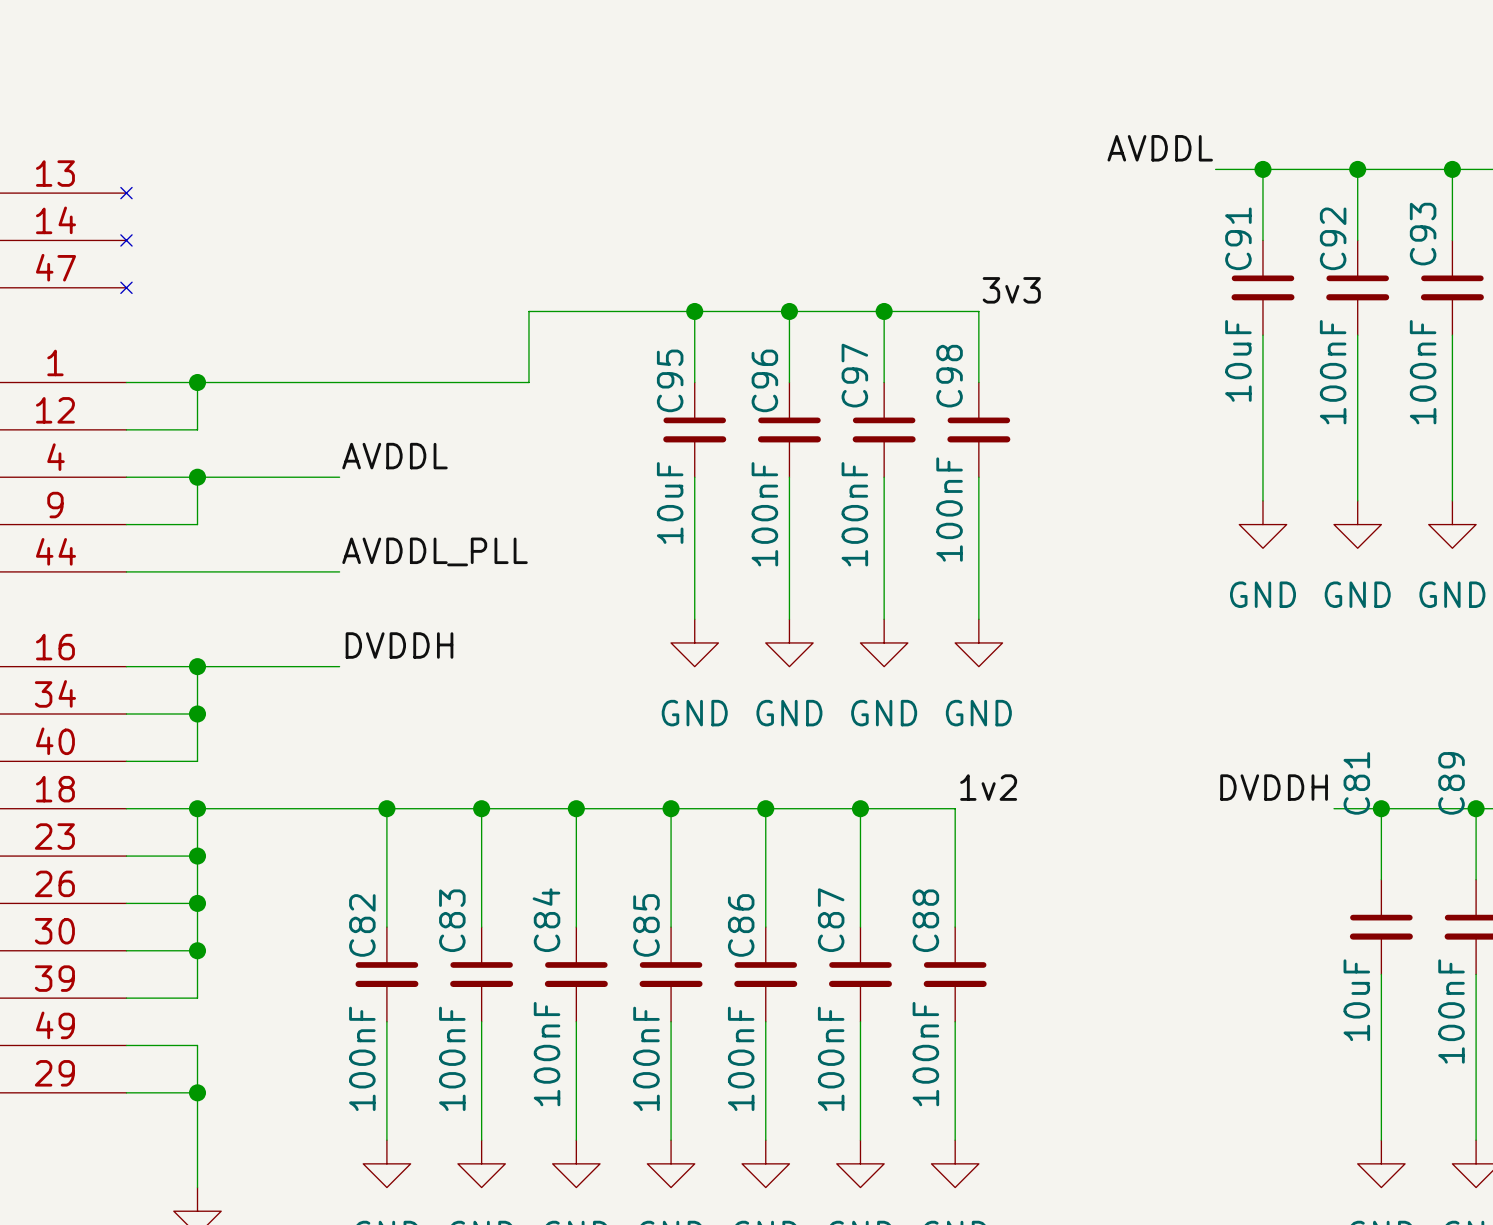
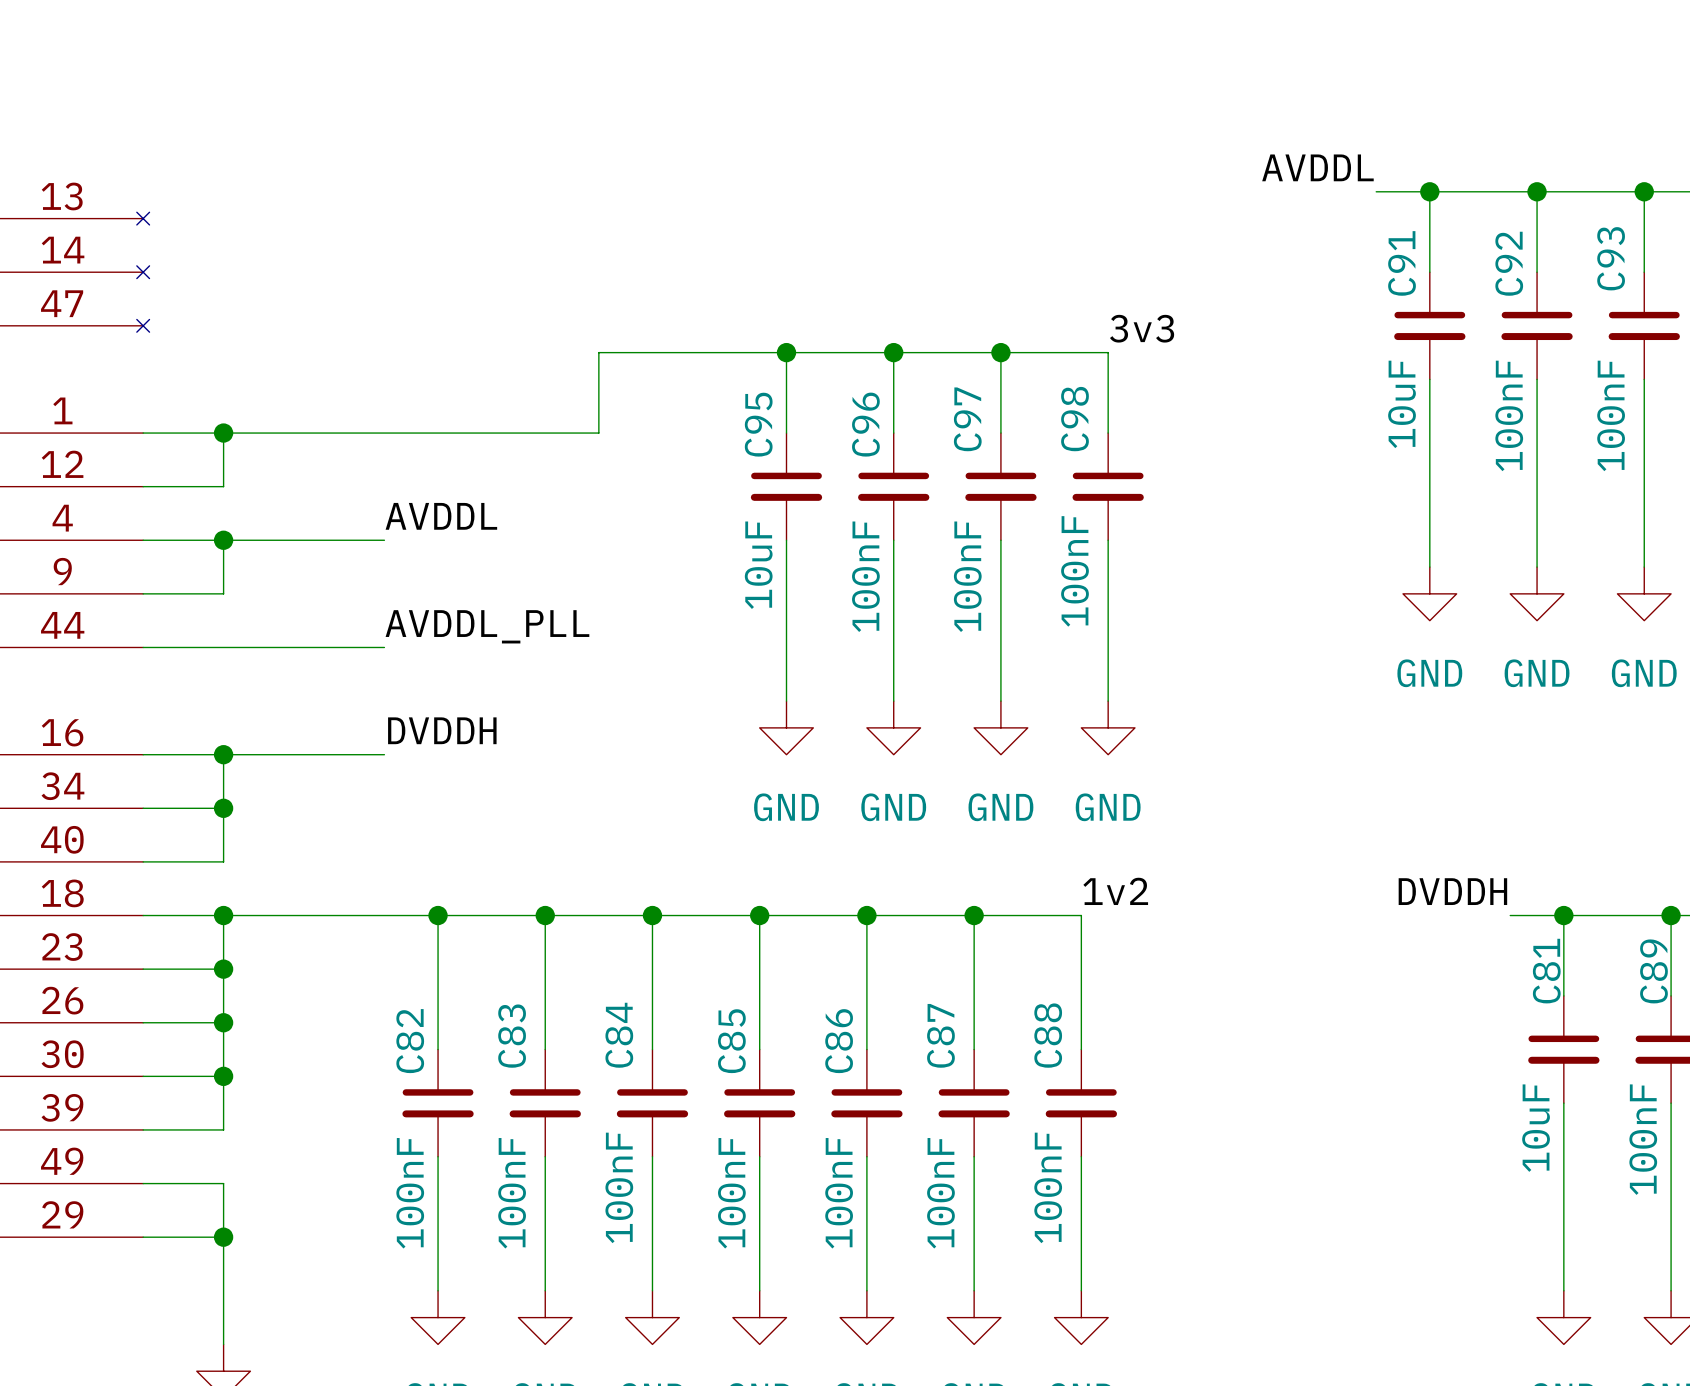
C81 name position: C81 (1356, 783) -> C81 (1546, 971)
C89 name position: C89 (1451, 783) -> C89 (1653, 971)

